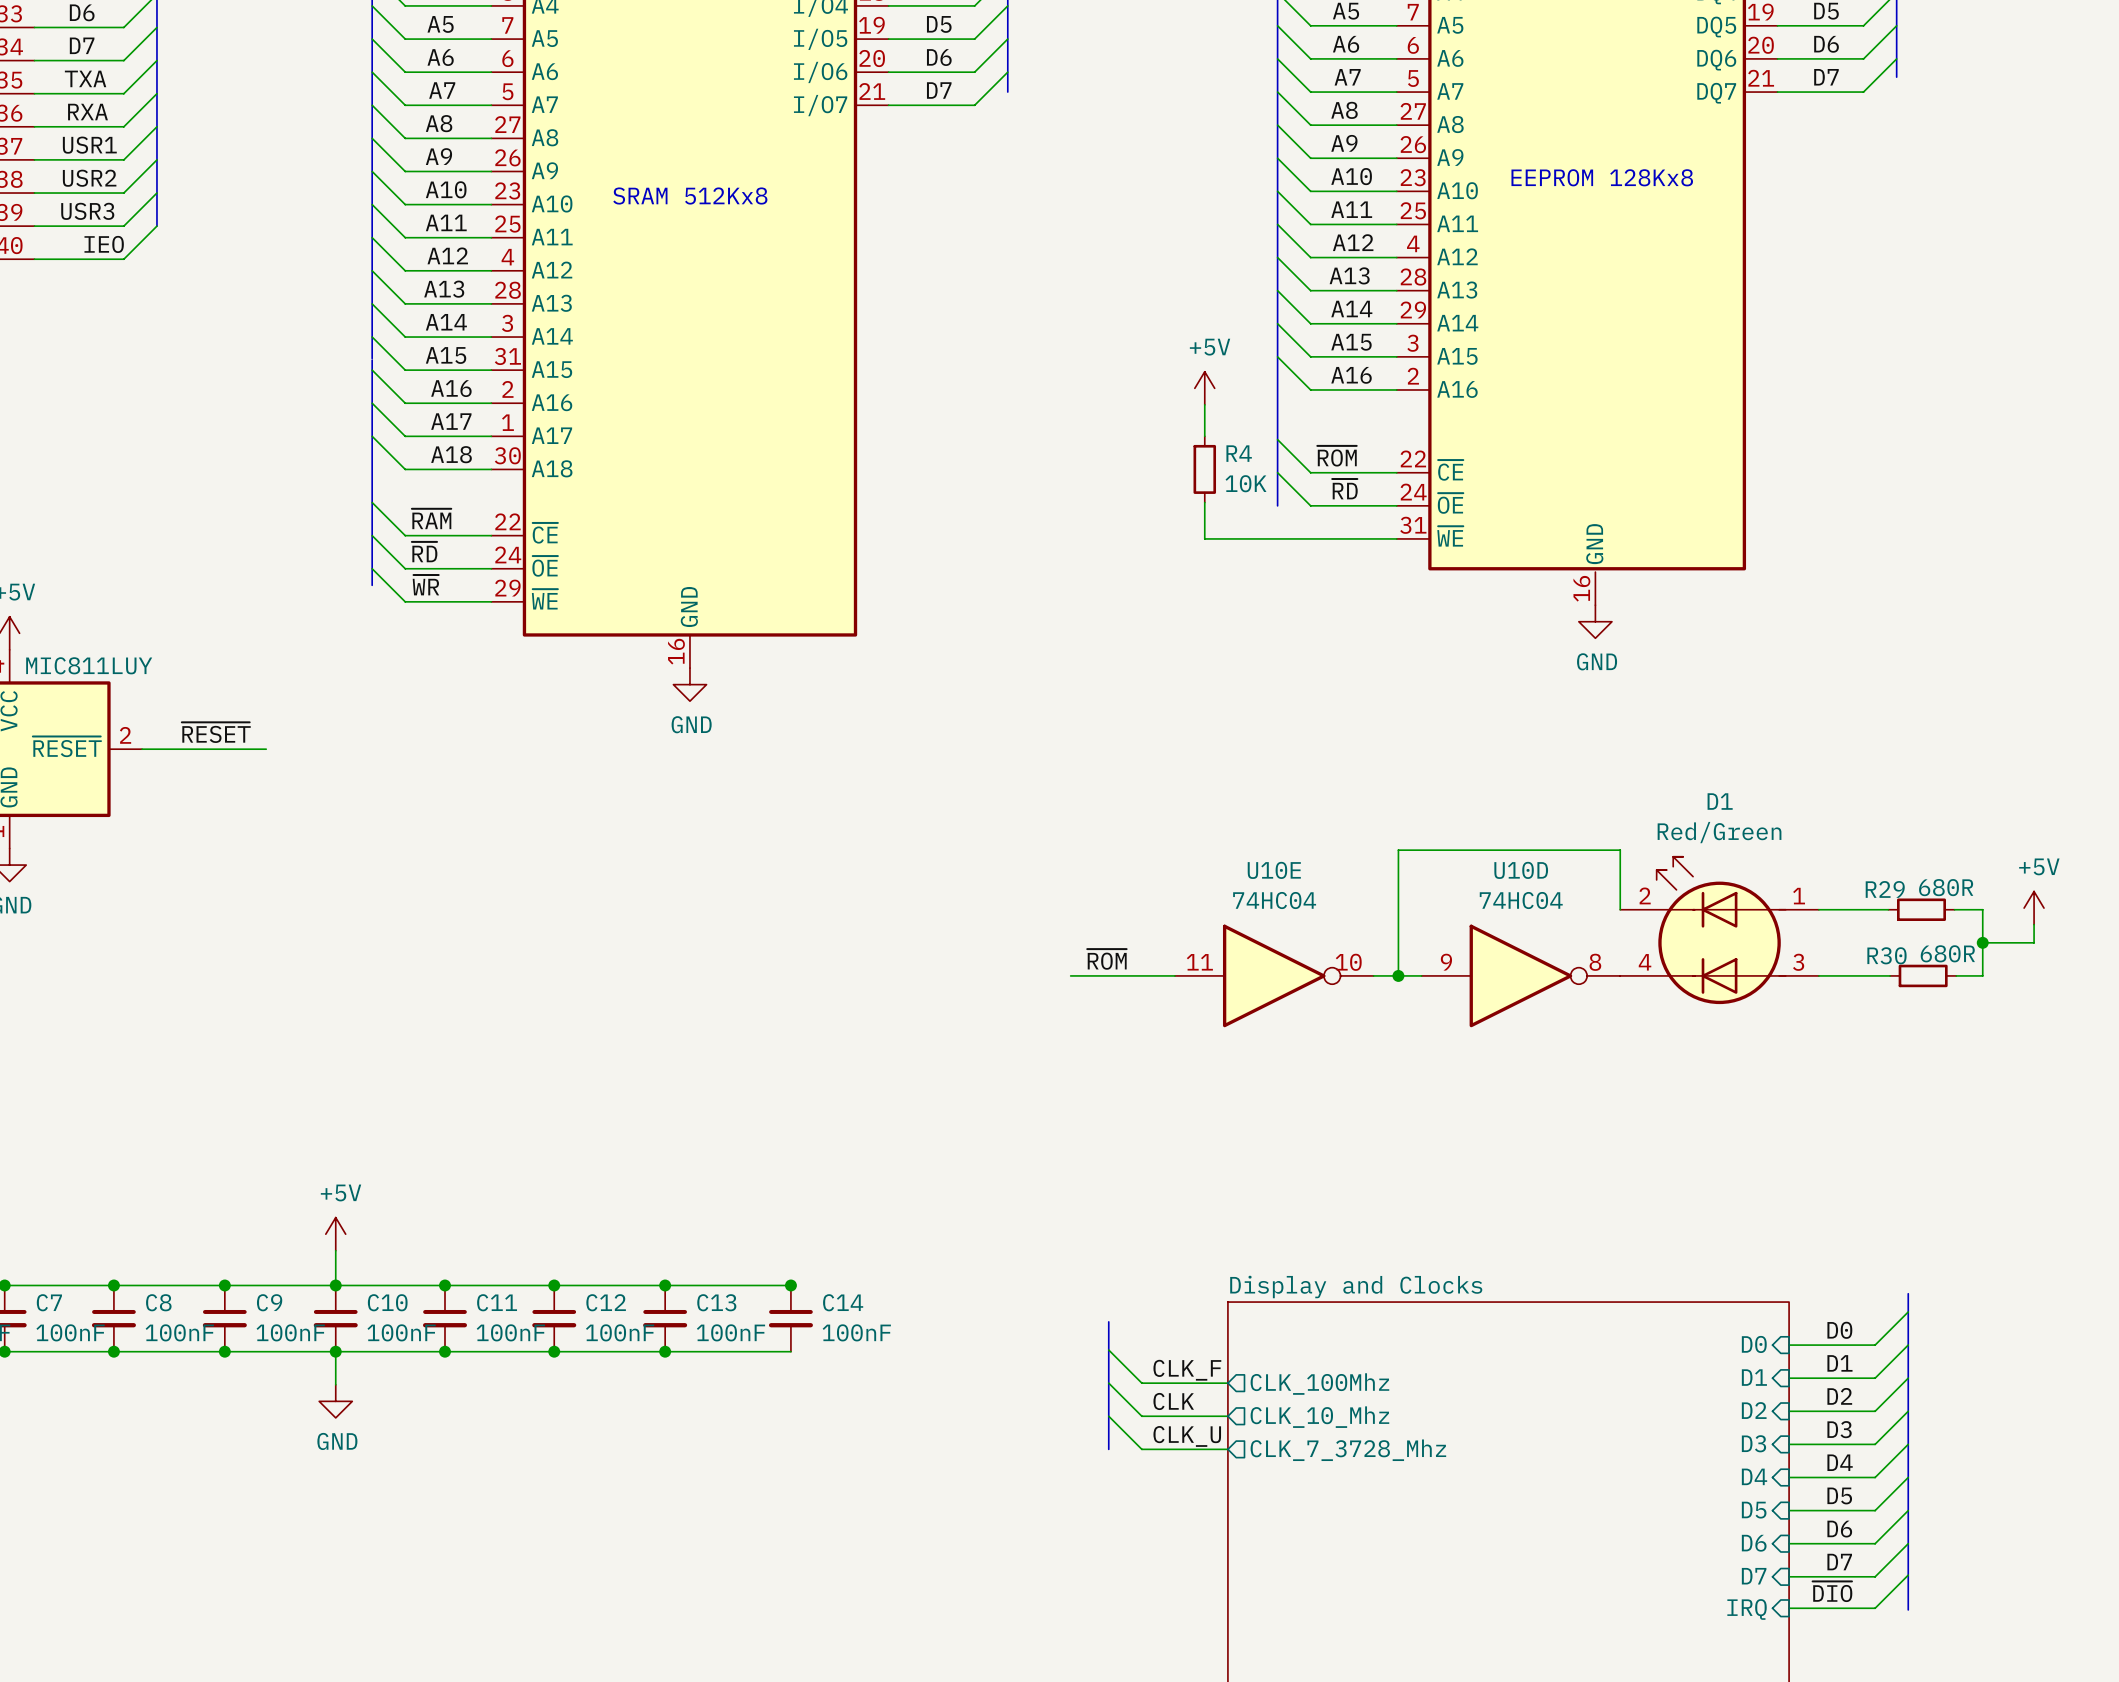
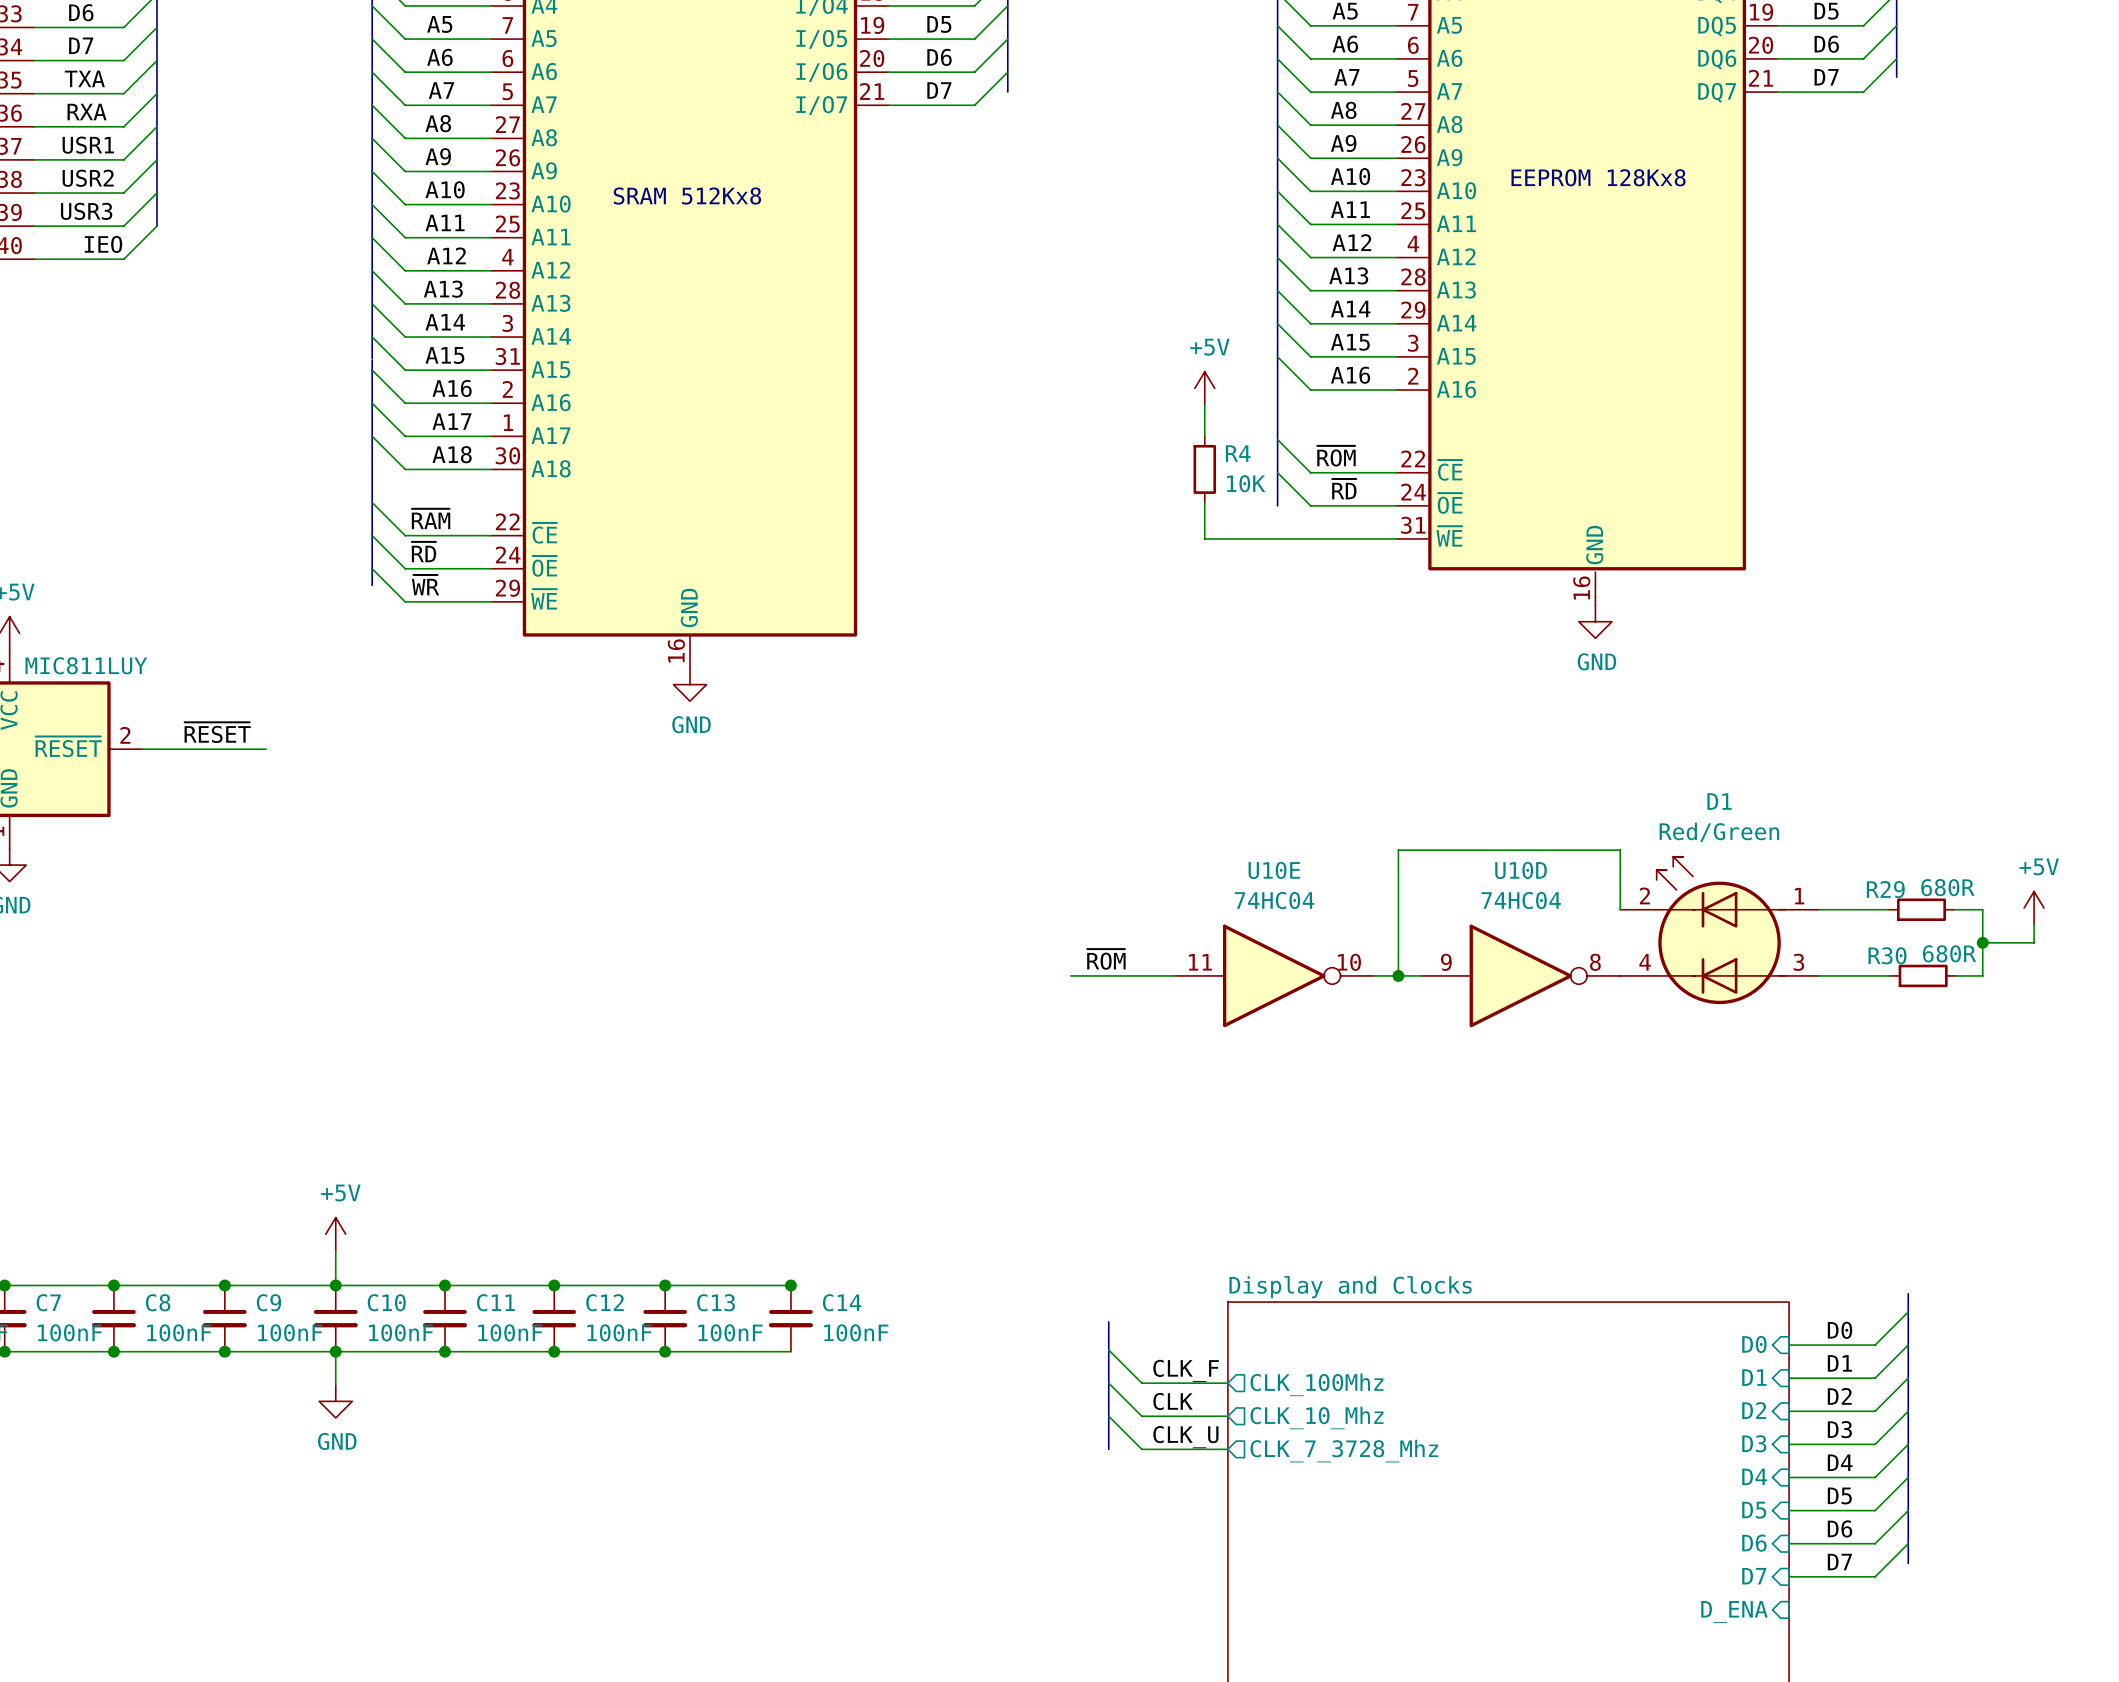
bus: (1908, 1563) (1908, 1609) -> none
wire: (1908, 1575) (1875, 1608) (1789, 1608) -> none
label: ~{DIO} (1832, 1591) -> none
sheet pin: IRQ (1747, 1609) -> D_ENA (1734, 1611)

